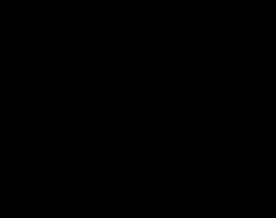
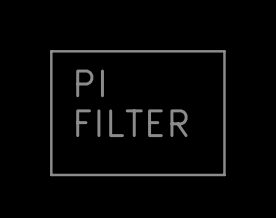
line: none -> (51, 51) (224, 51) (224, 174) (51, 174) (51, 51)
text: none -> PI (90, 83)
text: none -> FILTER (131, 123)

